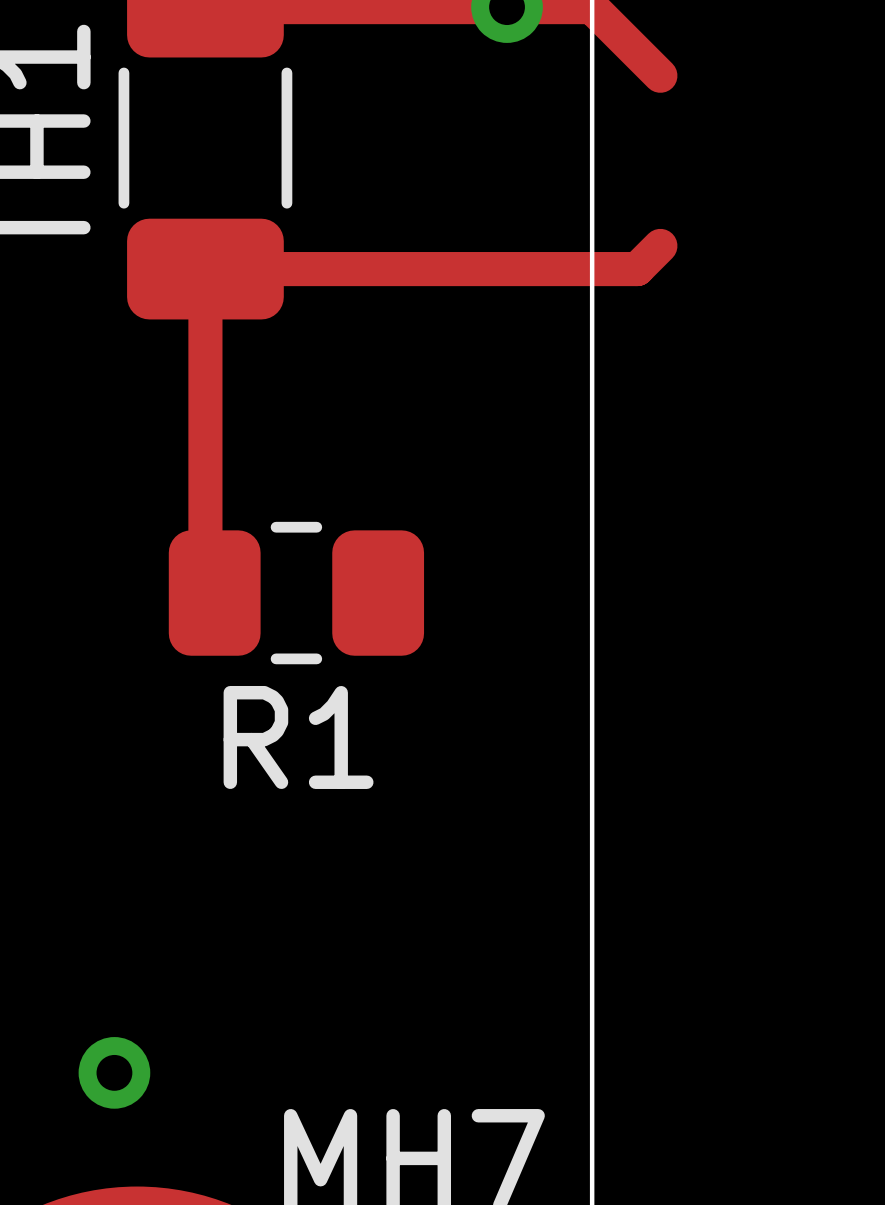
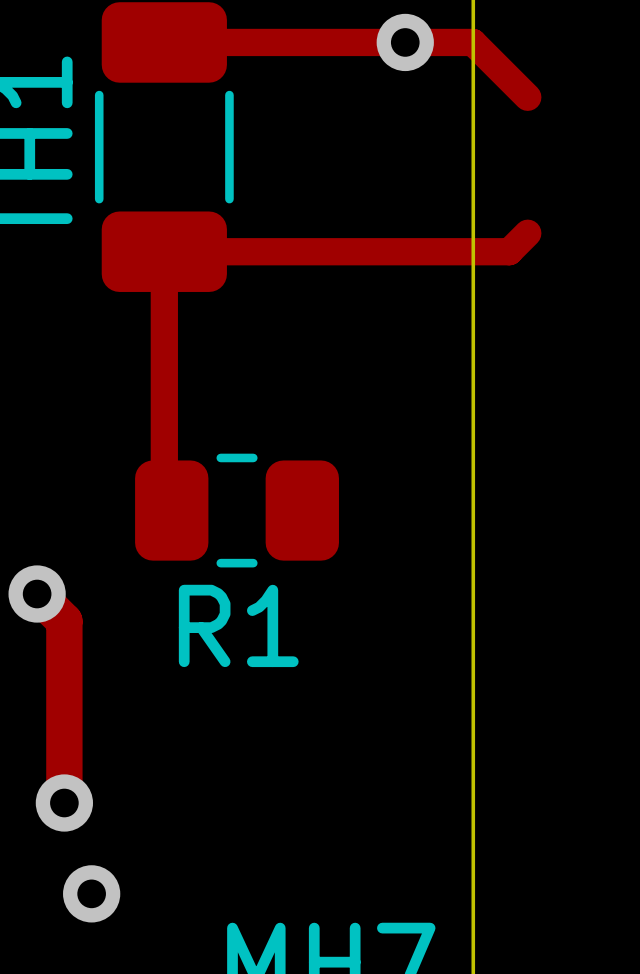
track: none -> (37, 594) (64, 621) (64, 803)
via: none -> (37, 594)
via: none -> (64, 803)

